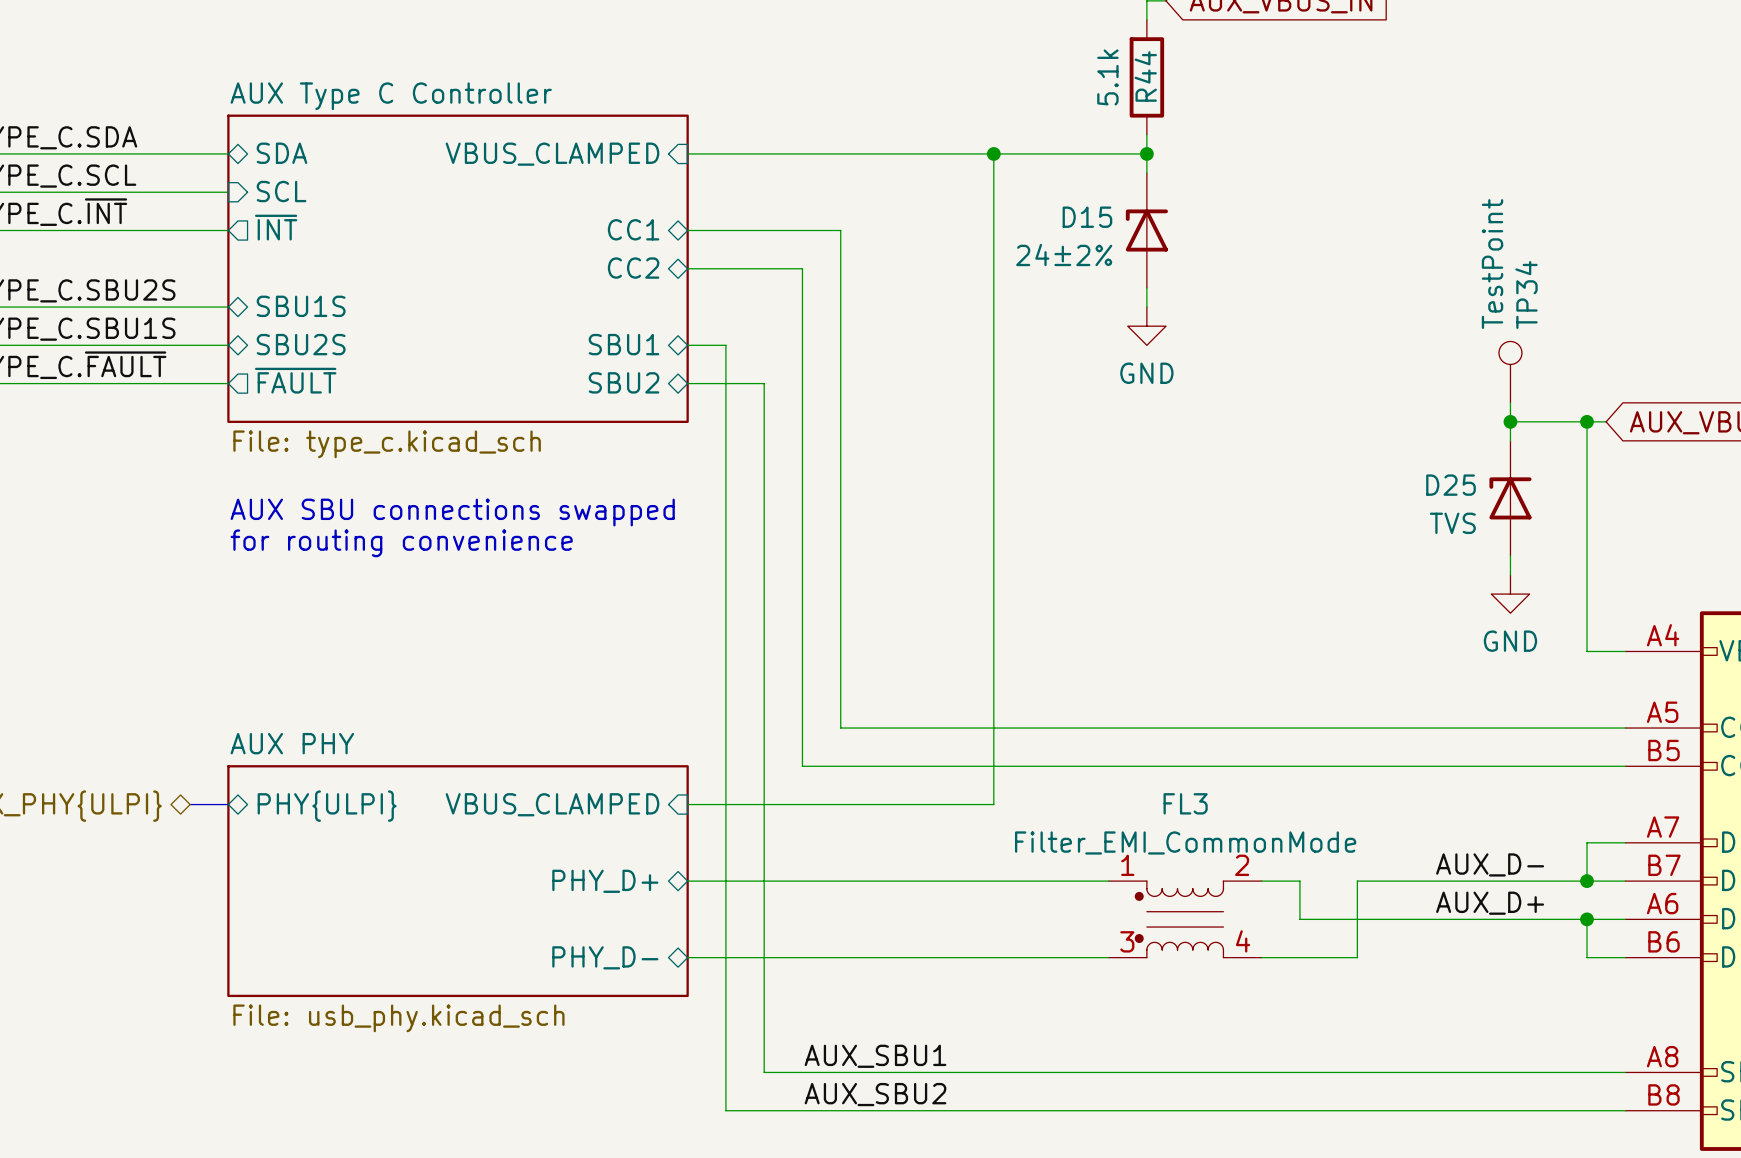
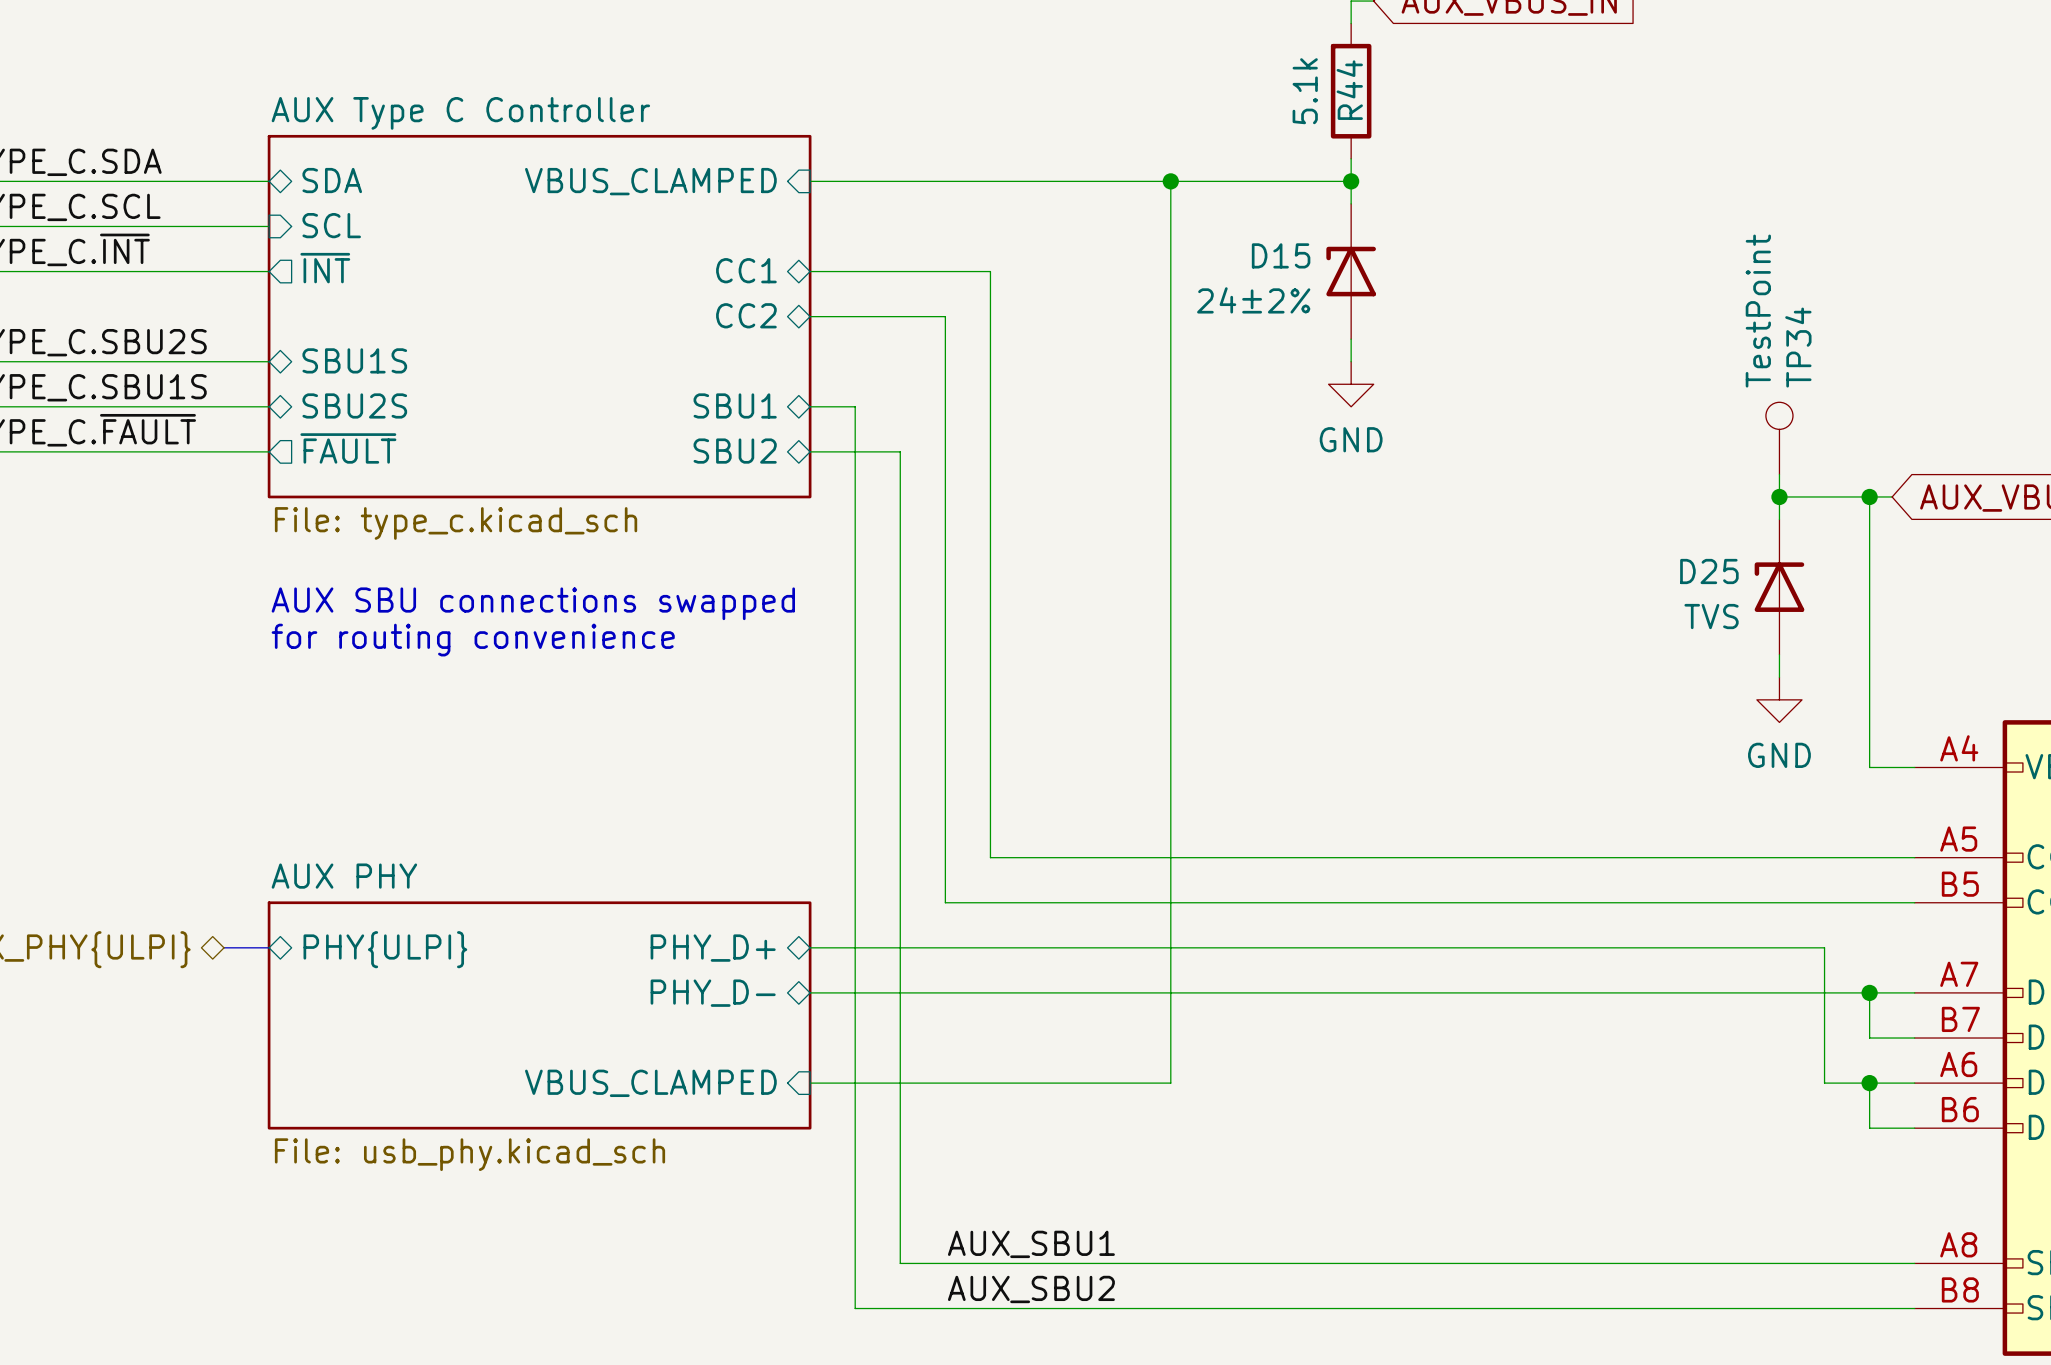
sheet pin shape: input (552, 804) -> bidirectional (713, 948)
sheet pin: VBUS_CLAMPED (552, 804) -> PHY_D+ (713, 948)
wire: none -> (810, 992) (1869, 992)
sheet AUX PHY: none -> File: usb_phy.kicad_sch (539, 1015)
label: AUX_D- (1490, 864) -> none
sheet AUX PHY: File: usb_phy.kicad_sch (458, 881) -> none
sheet pin: PHY_D+ (605, 881) -> none
wire: (687, 881) (1108, 881) -> none
wire: (1261, 881) (1299, 881) (1299, 919) (1548, 919) -> (810, 1083) (1170, 1083) (1170, 947) (1824, 947) (1824, 1083)
wire: (1587, 881) (1357, 881) (1357, 957) (1261, 957) -> none
junction position: (1587, 881) -> (1869, 992)
label: AUX_D+ (1490, 903) -> none
sheet pin: none -> VBUS_CLAMPED (650, 1083)
FL3: Filter_EMI_CommonMode (1185, 919) -> none
sheet pin position: PHY_D- (605, 957) -> PHY_D- (713, 993)
wire: (687, 957) (1108, 957) -> none

